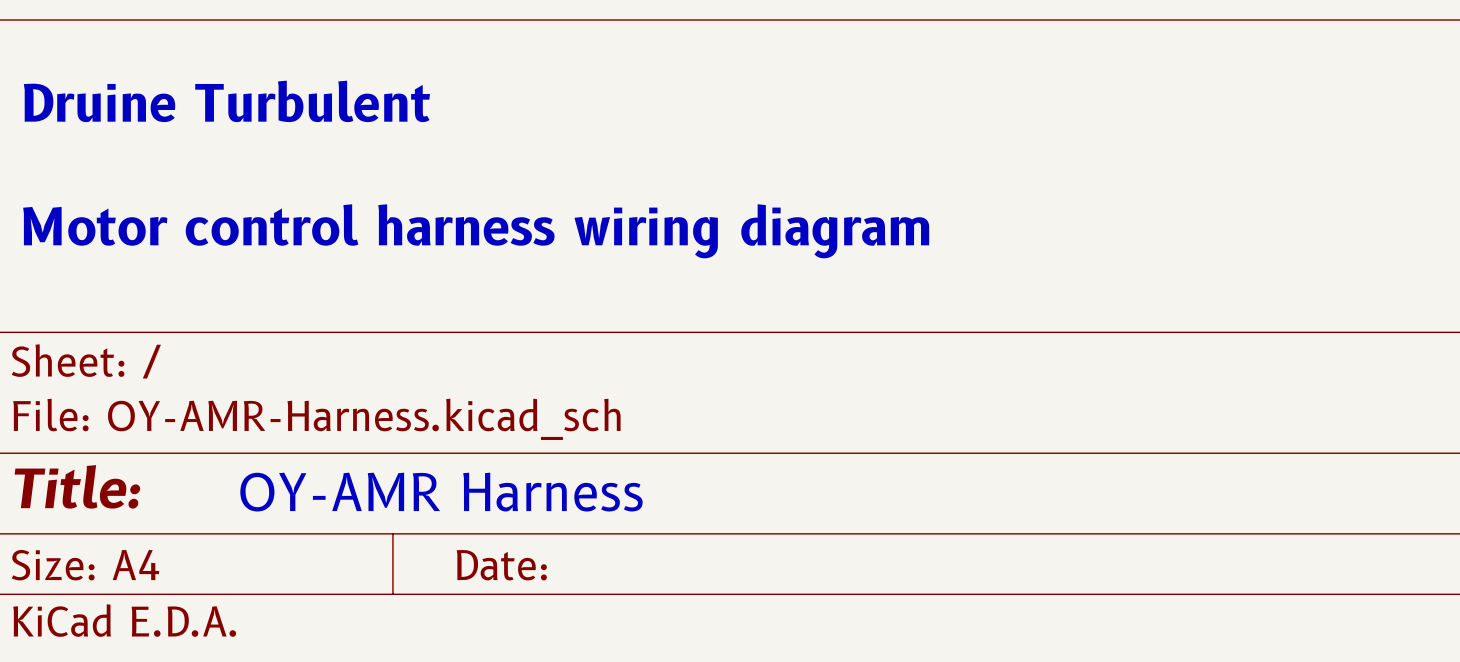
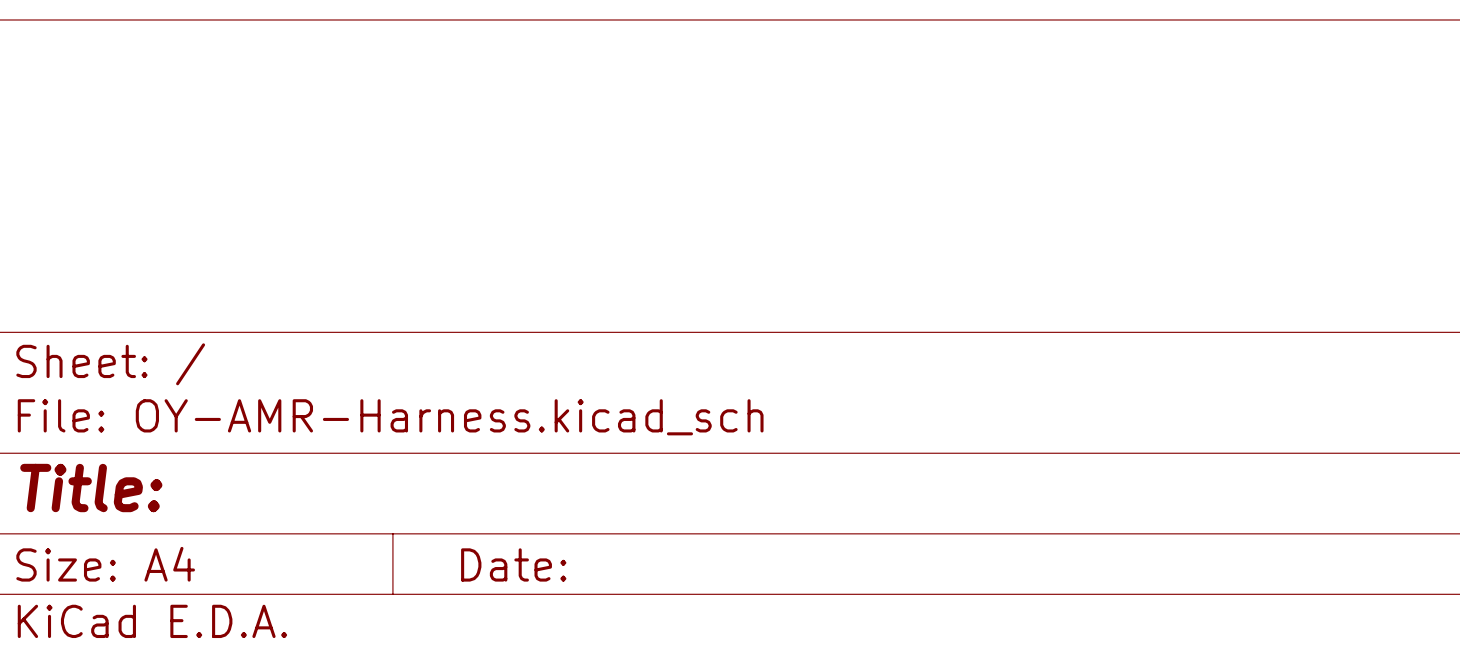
text: Druine Turbulent (226, 101) -> none
text: Motor control harness wiring diagram (476, 231) -> none
text: OY-AMR Harness (441, 492) -> none

